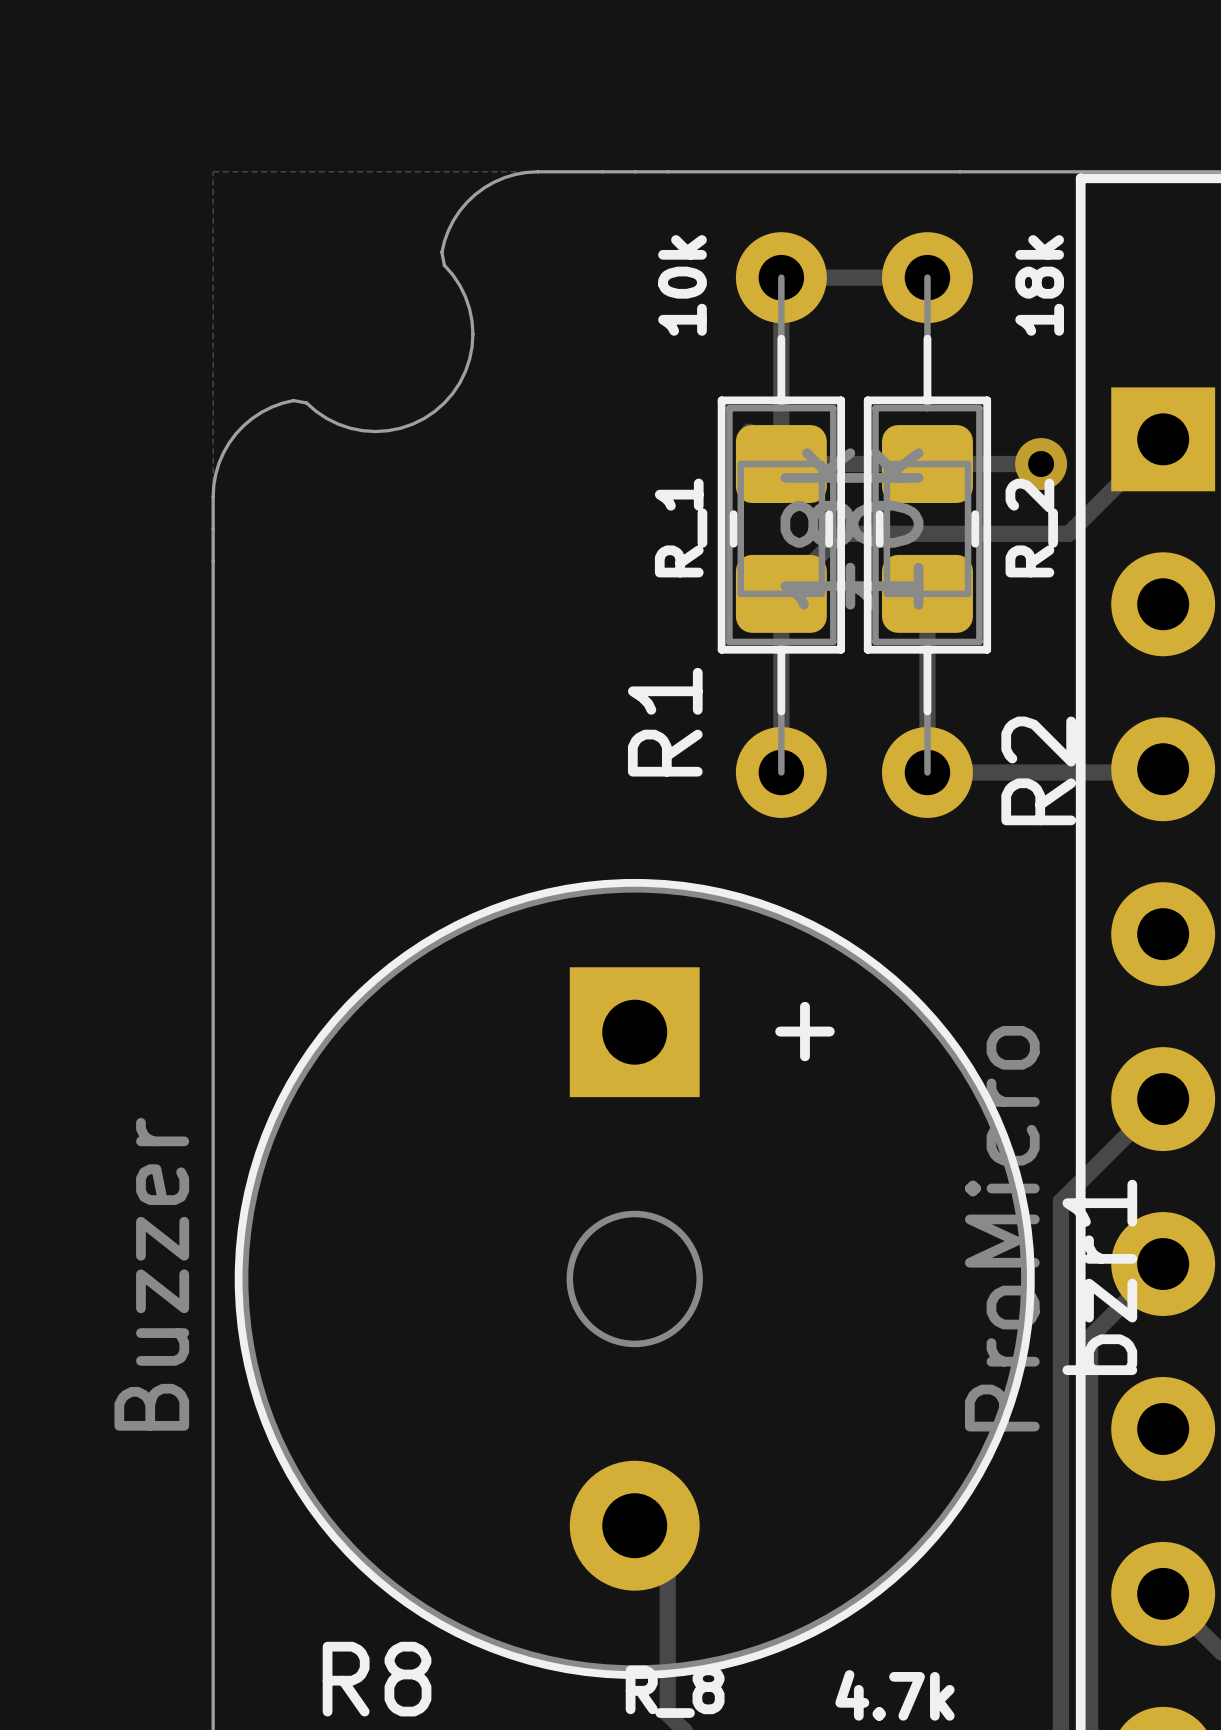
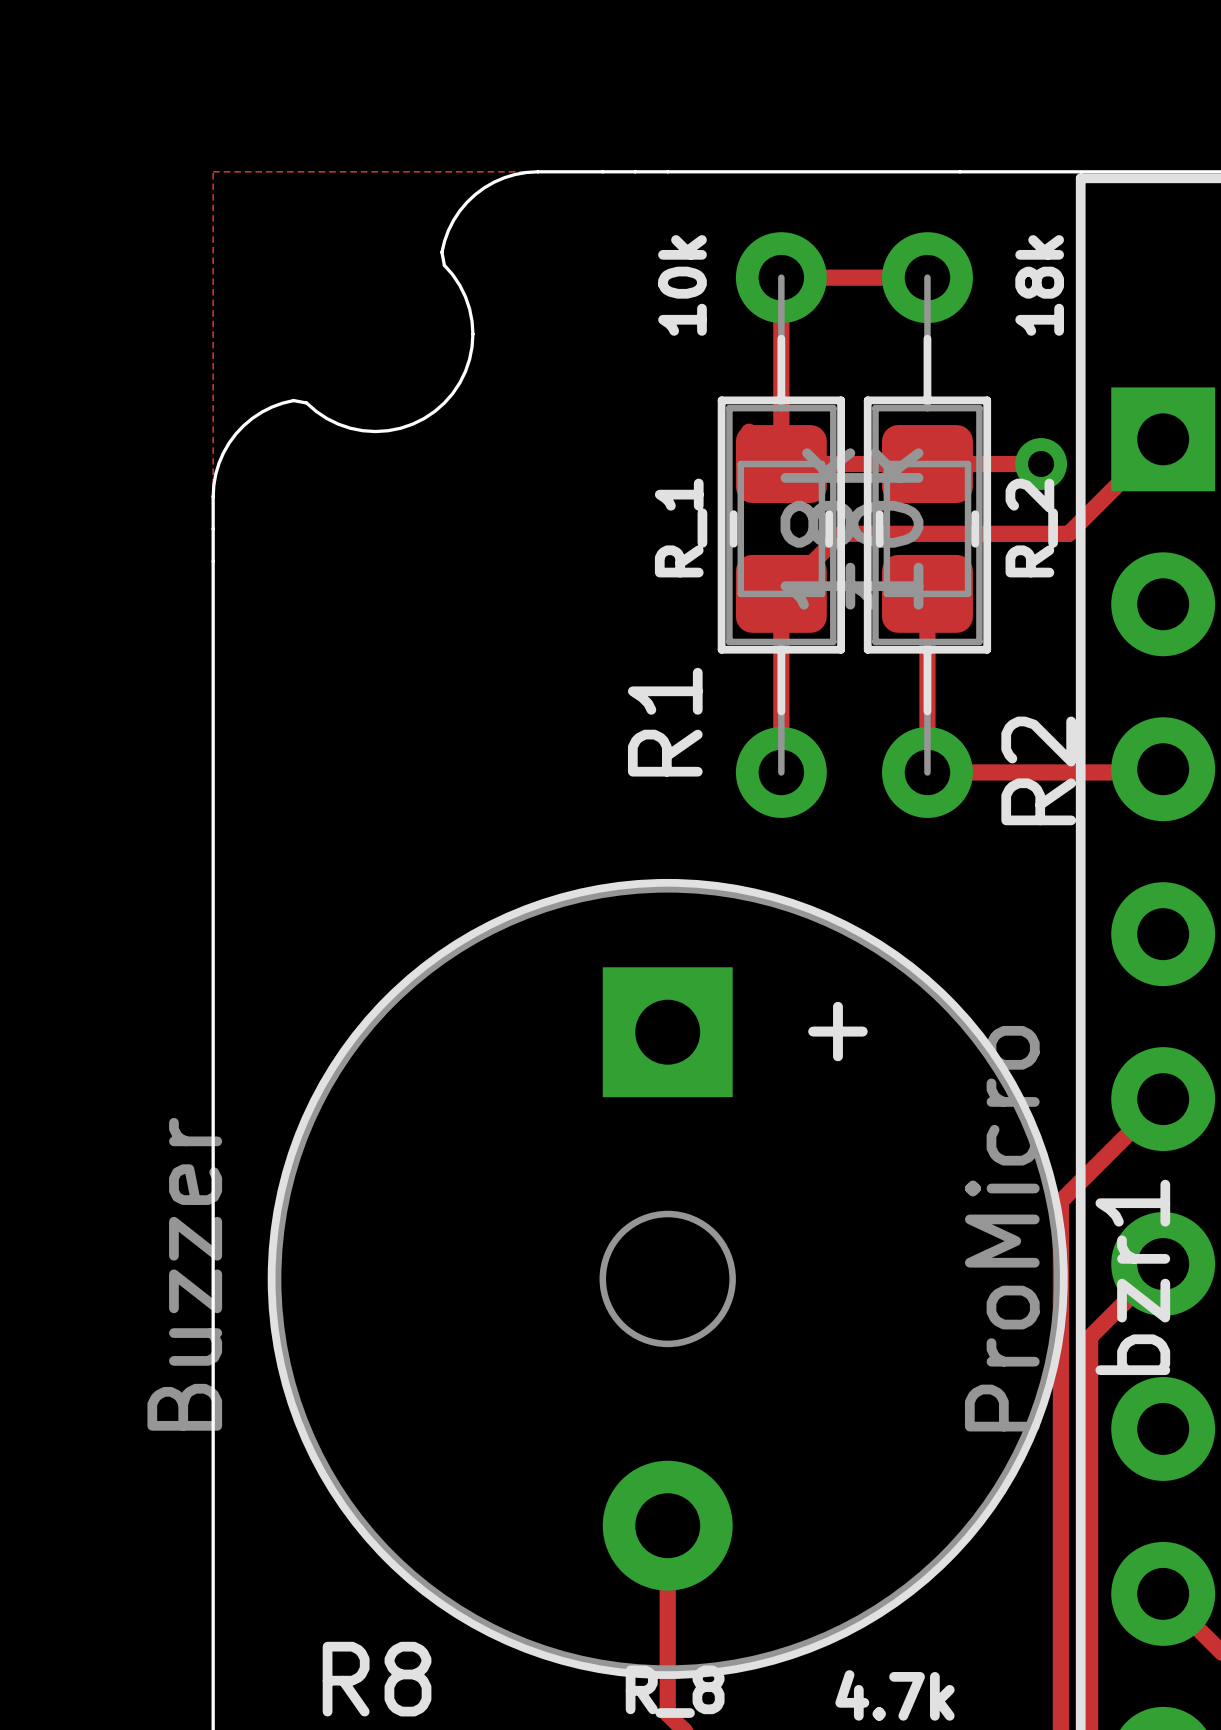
bzr1 position: (634, 1278) -> (667, 1278)

